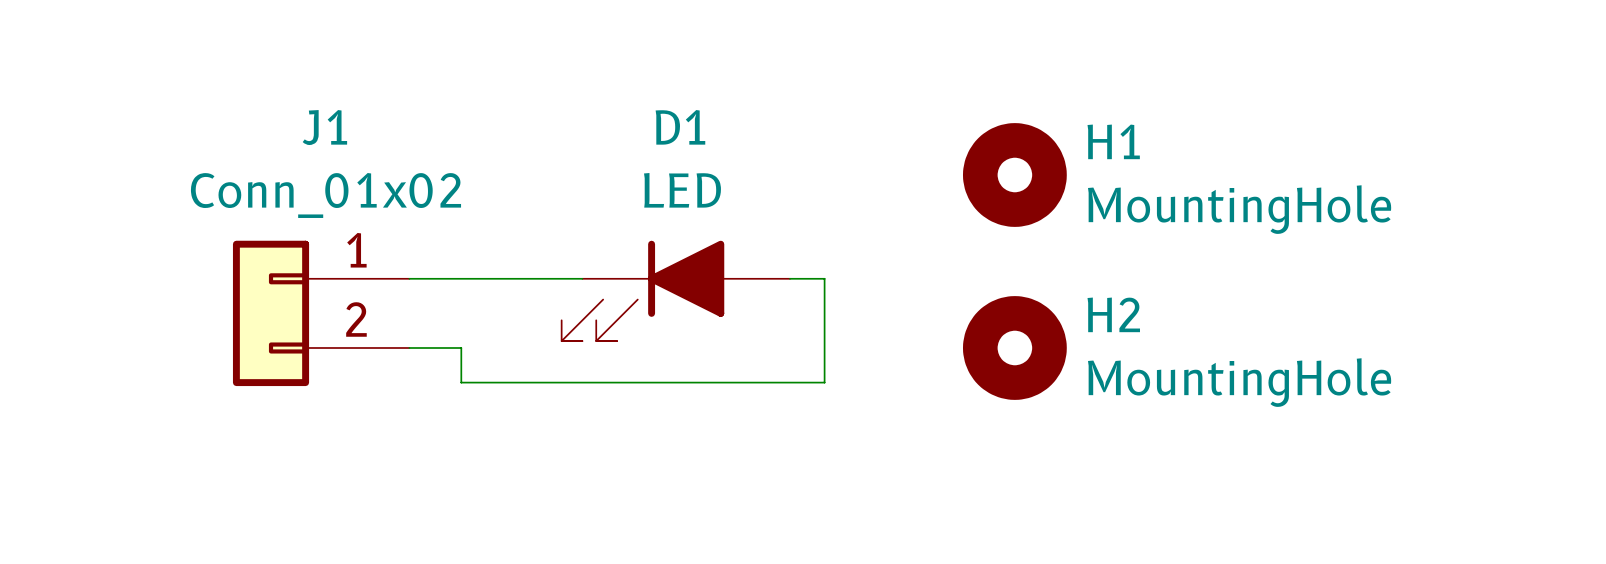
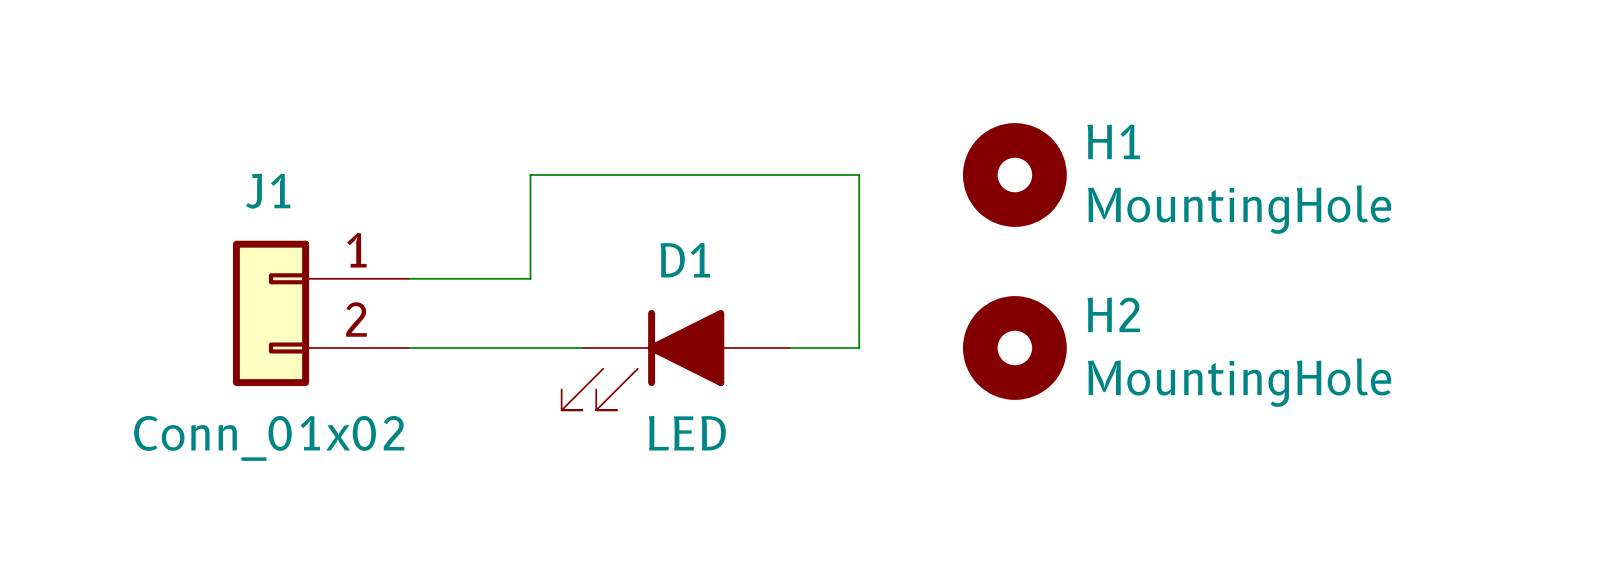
J1 name position: J1 (324, 127) -> J1 (268, 191)
D1 name position: D1 (680, 127) -> D1 (685, 260)
D1 value position: LED (682, 190) -> LED (687, 433)
J1 value position: Conn_01x02 (325, 195) -> Conn_01x02 (269, 438)
wire: (530, 278) (582, 278) -> (530, 278) (530, 175) (859, 175) (859, 347) (789, 347)
wire: (789, 278) (824, 278) (824, 382) (461, 382) (461, 347) -> (582, 347) (461, 347)
D1 position: (675, 290) -> (675, 360)

